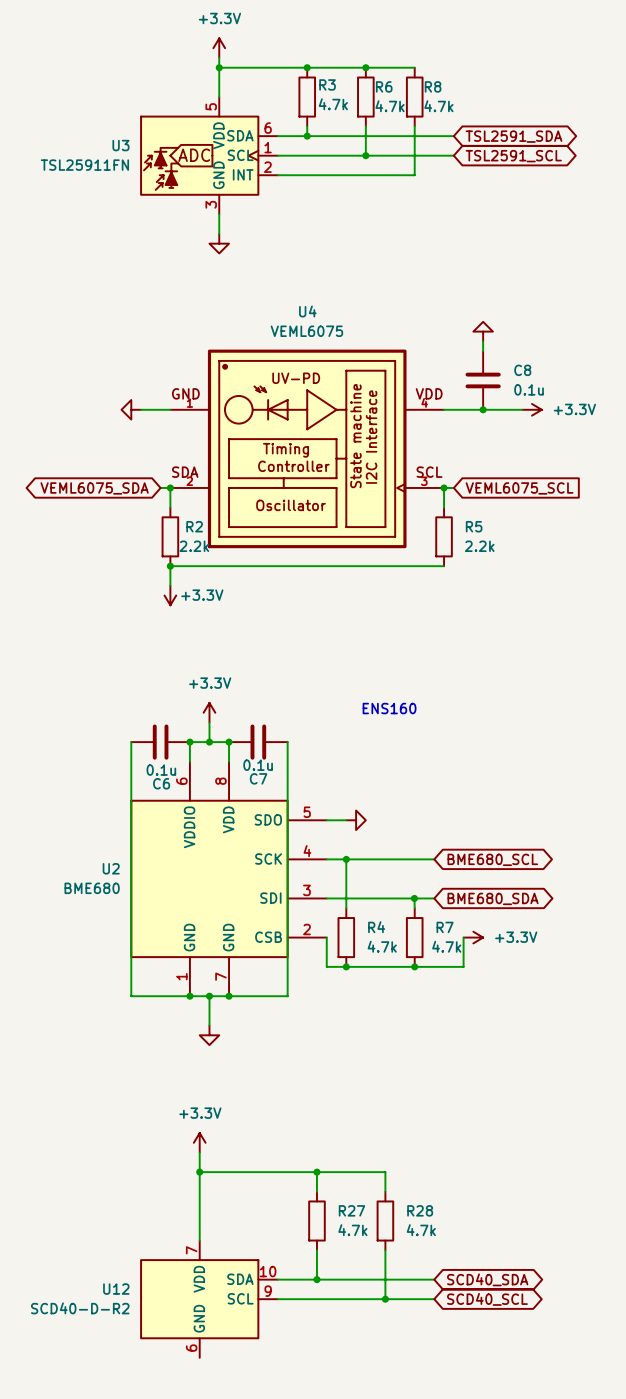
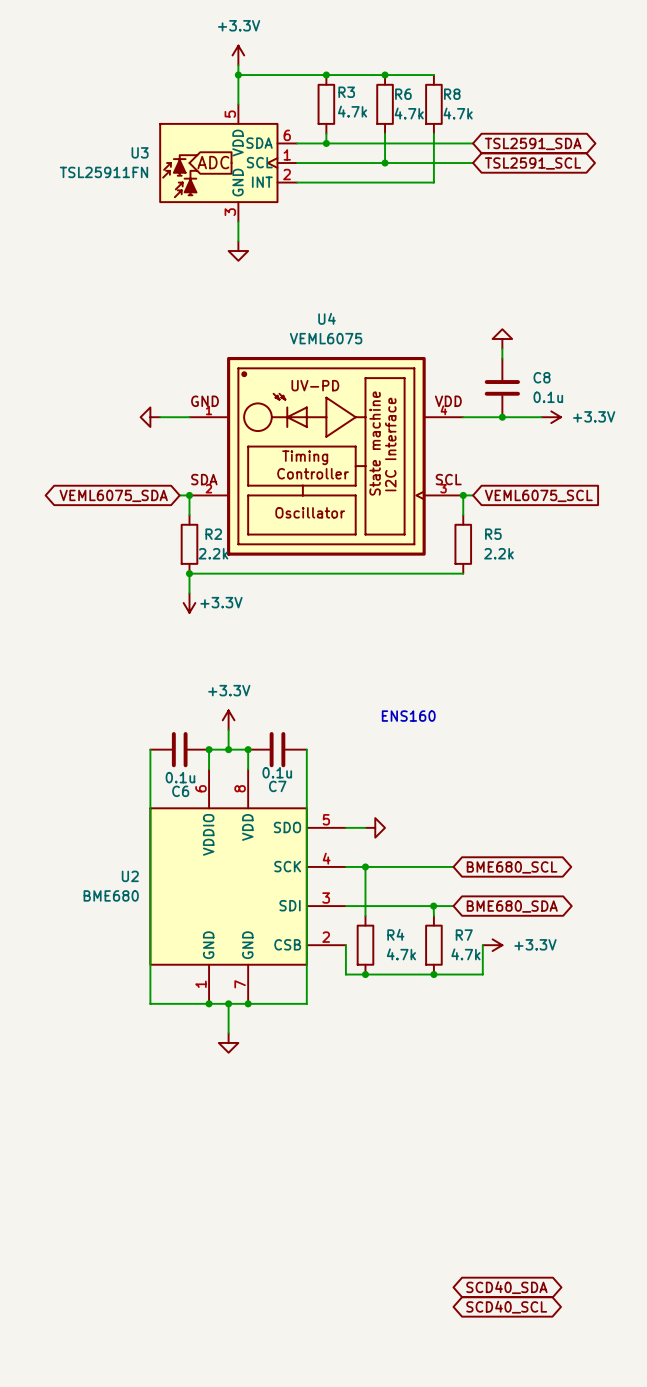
power symbol: +3.3V (199, 1142) -> none
wire: (199, 1152) (199, 1240) -> none
wire: (199, 1172) (385, 1172) (385, 1191) -> none
junction: (199, 1172) -> none
wire: (316, 1172) (316, 1191) -> none
junction: (316, 1172) -> none
R27: 4.7k (316, 1221) -> none
R28: 4.7k (385, 1221) -> none
wire: (316, 1250) (316, 1279) -> none
wire: (385, 1250) (385, 1299) -> none
wire: (277, 1279) (434, 1279) -> none
junction: (316, 1279) -> none
U12: SCD40-D-R2 (208, 1299) -> none
wire: (277, 1299) (434, 1299) -> none
junction: (385, 1299) -> none

